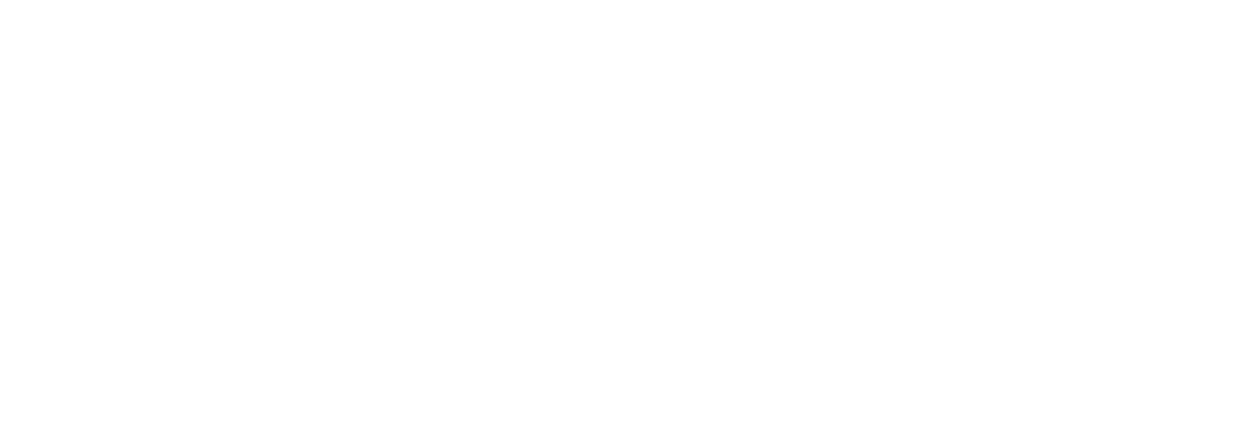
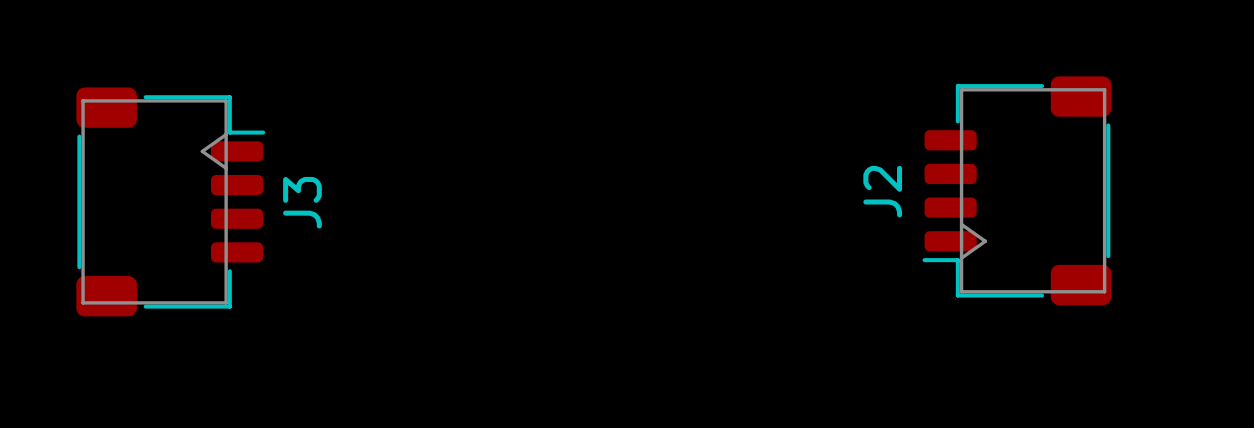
J2: none -> (1016, 190)
J3: none -> (170, 201)

